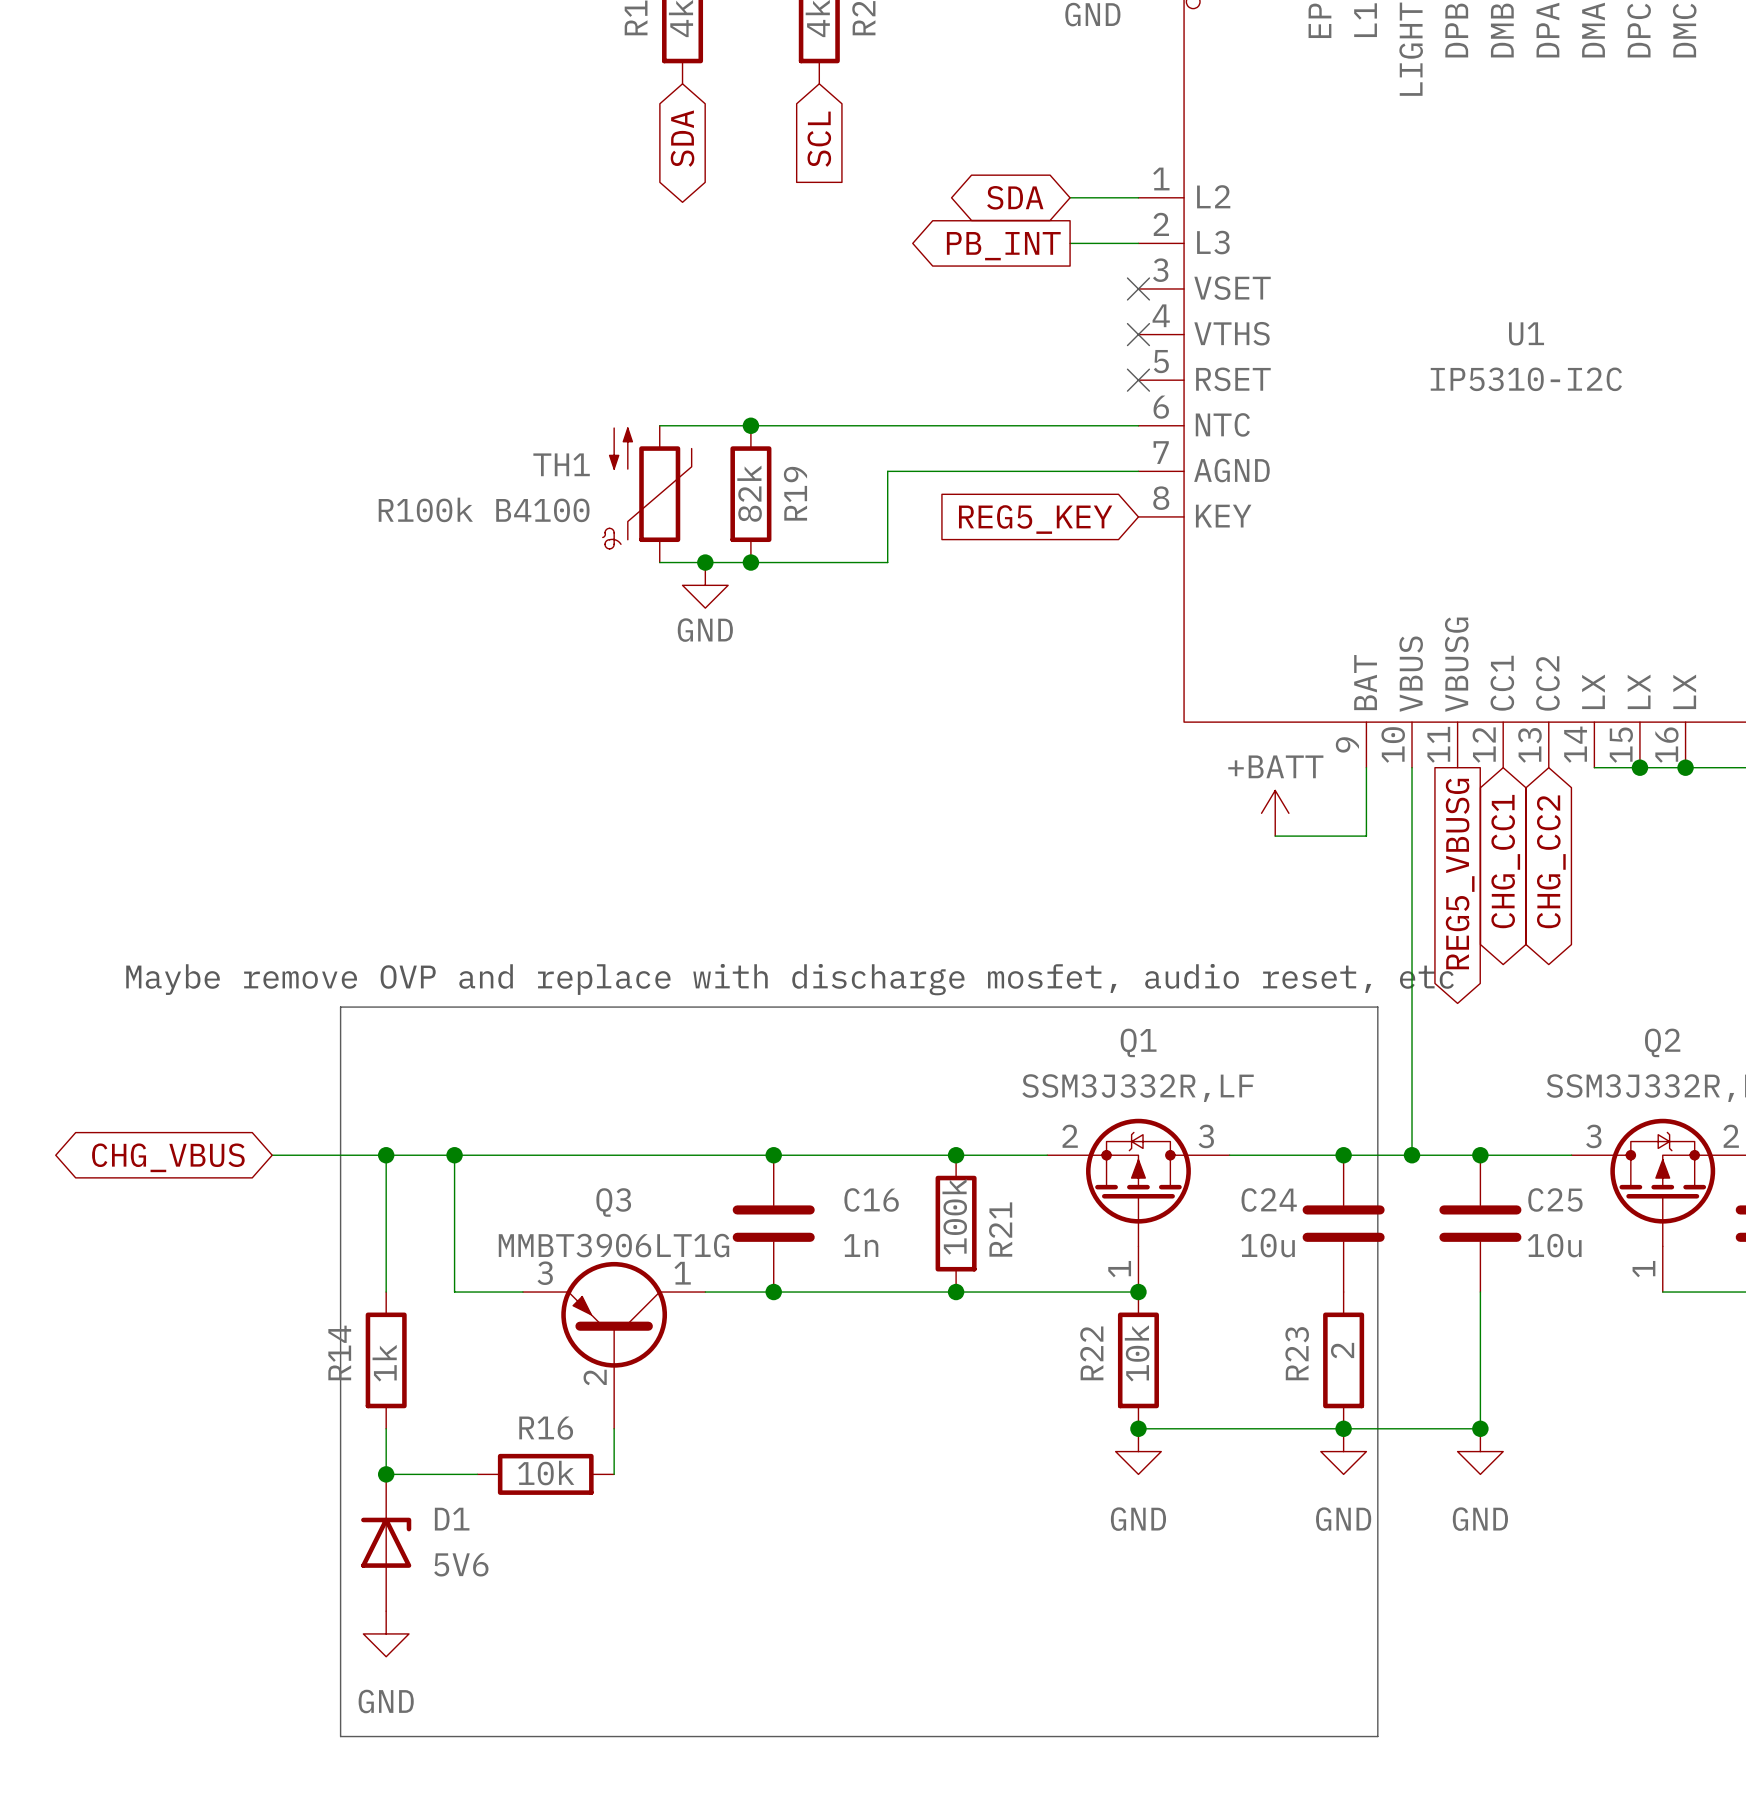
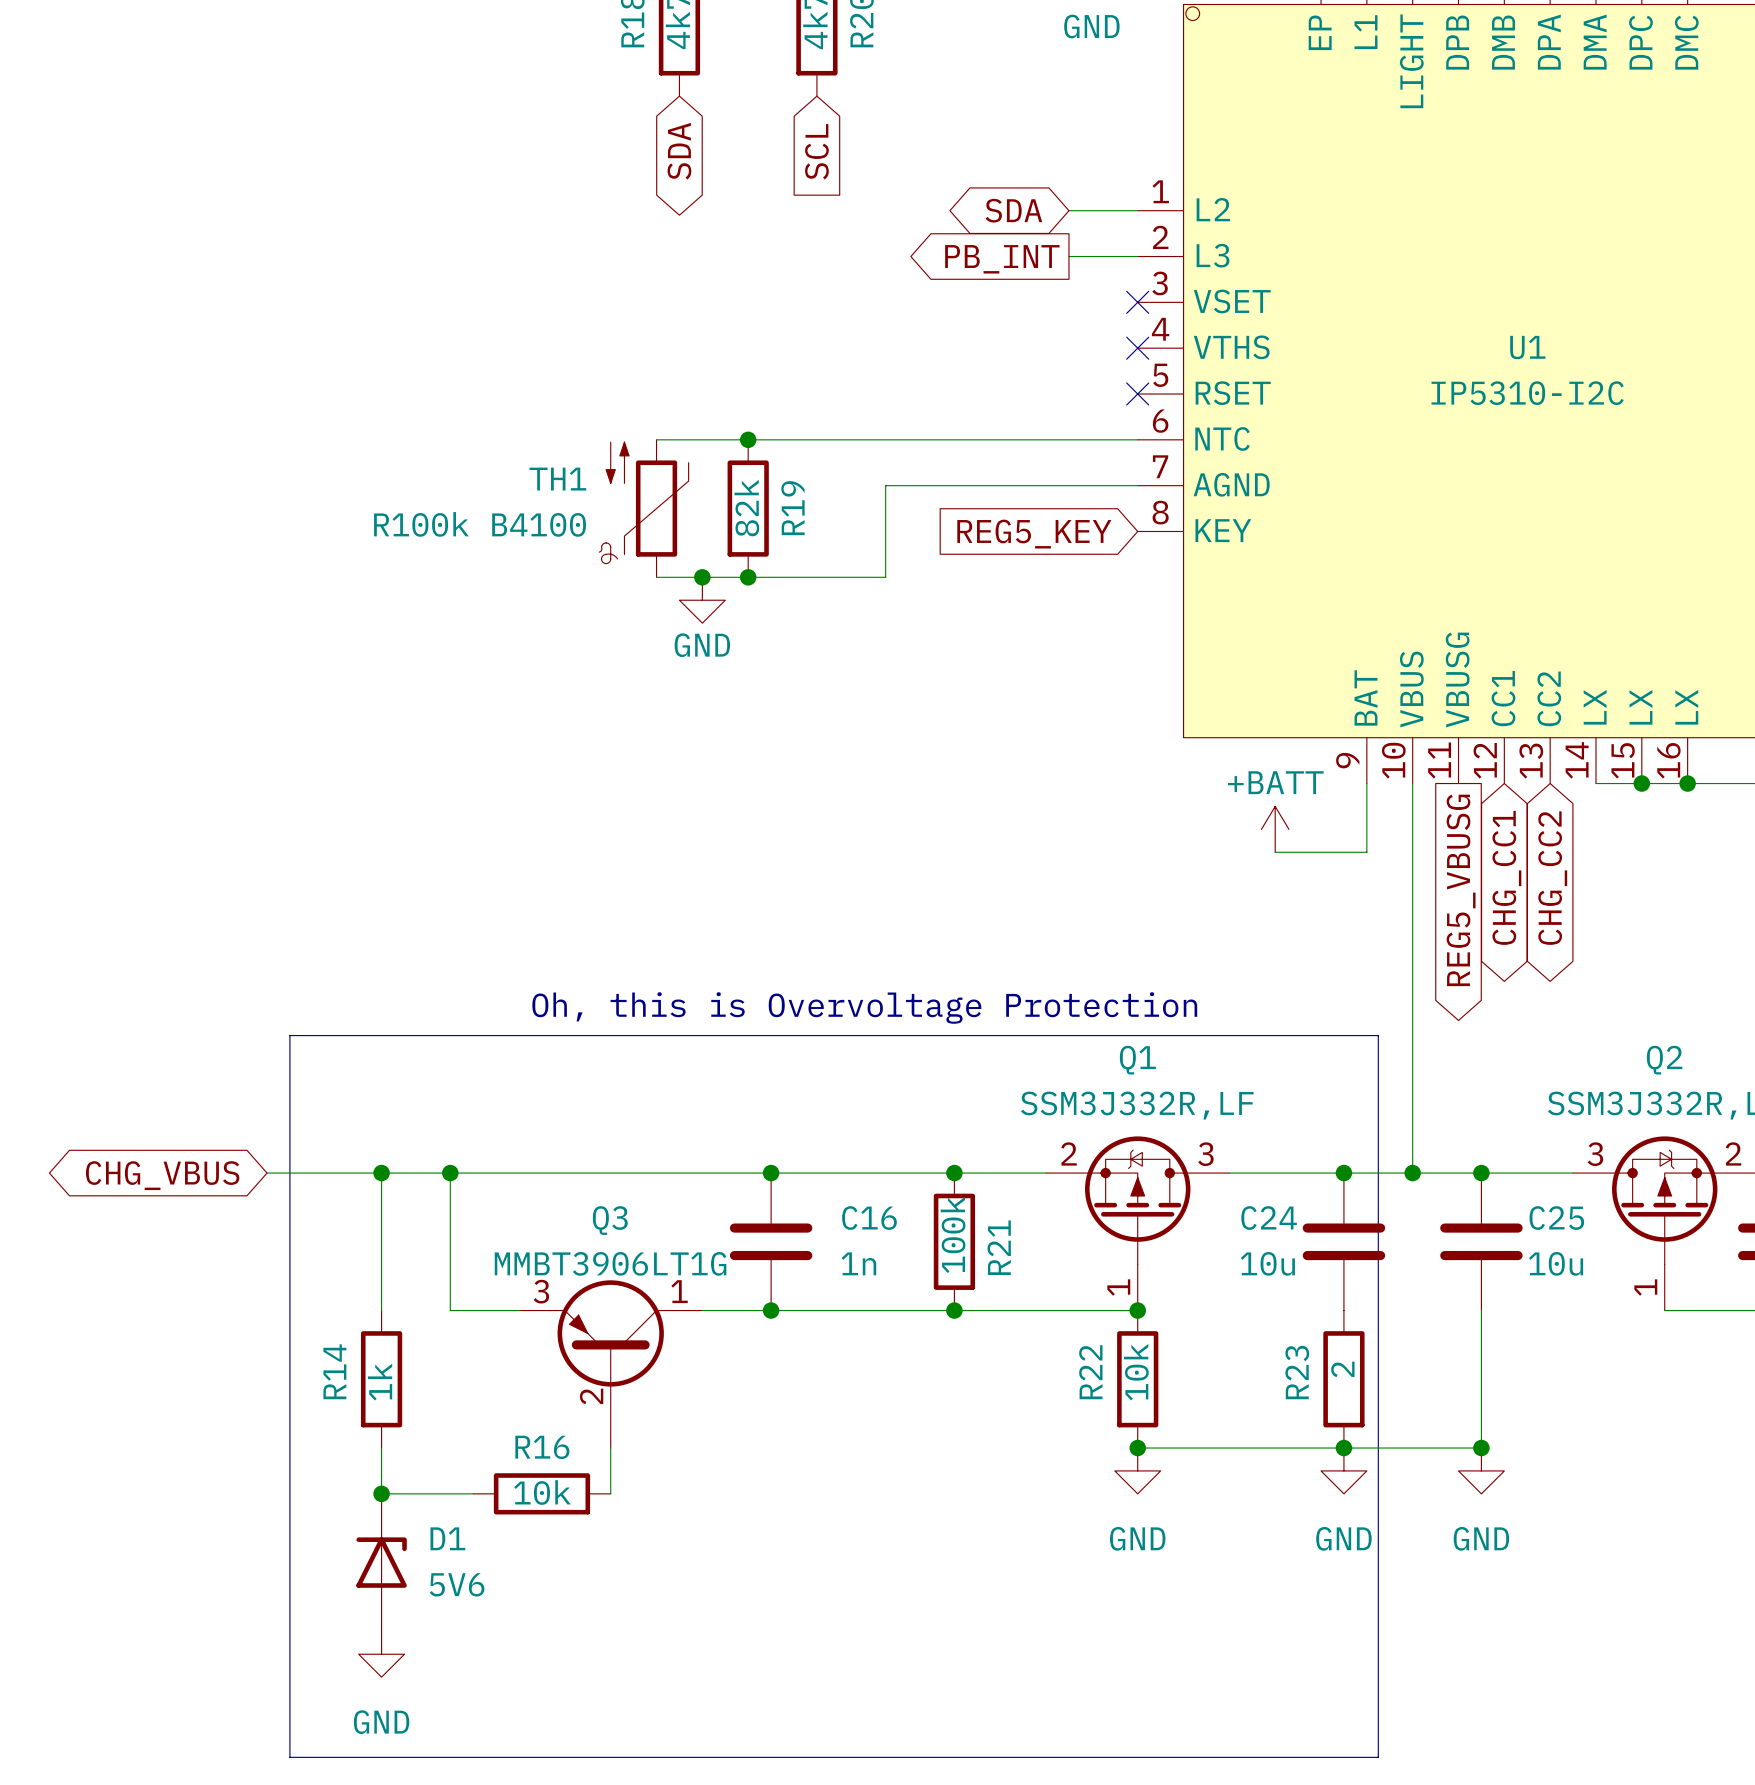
text: Maybe remove OVP and replace with discharge mosfet, audio reset, etc (790, 979) -> none
text: none -> Oh, this is Overvoltage Protection (864, 1008)
line: (1377, 1018) (1377, 1007) (340, 1007) (340, 1736) -> (1378, 1035) (289, 1035) (289, 1757) (335, 1757)

